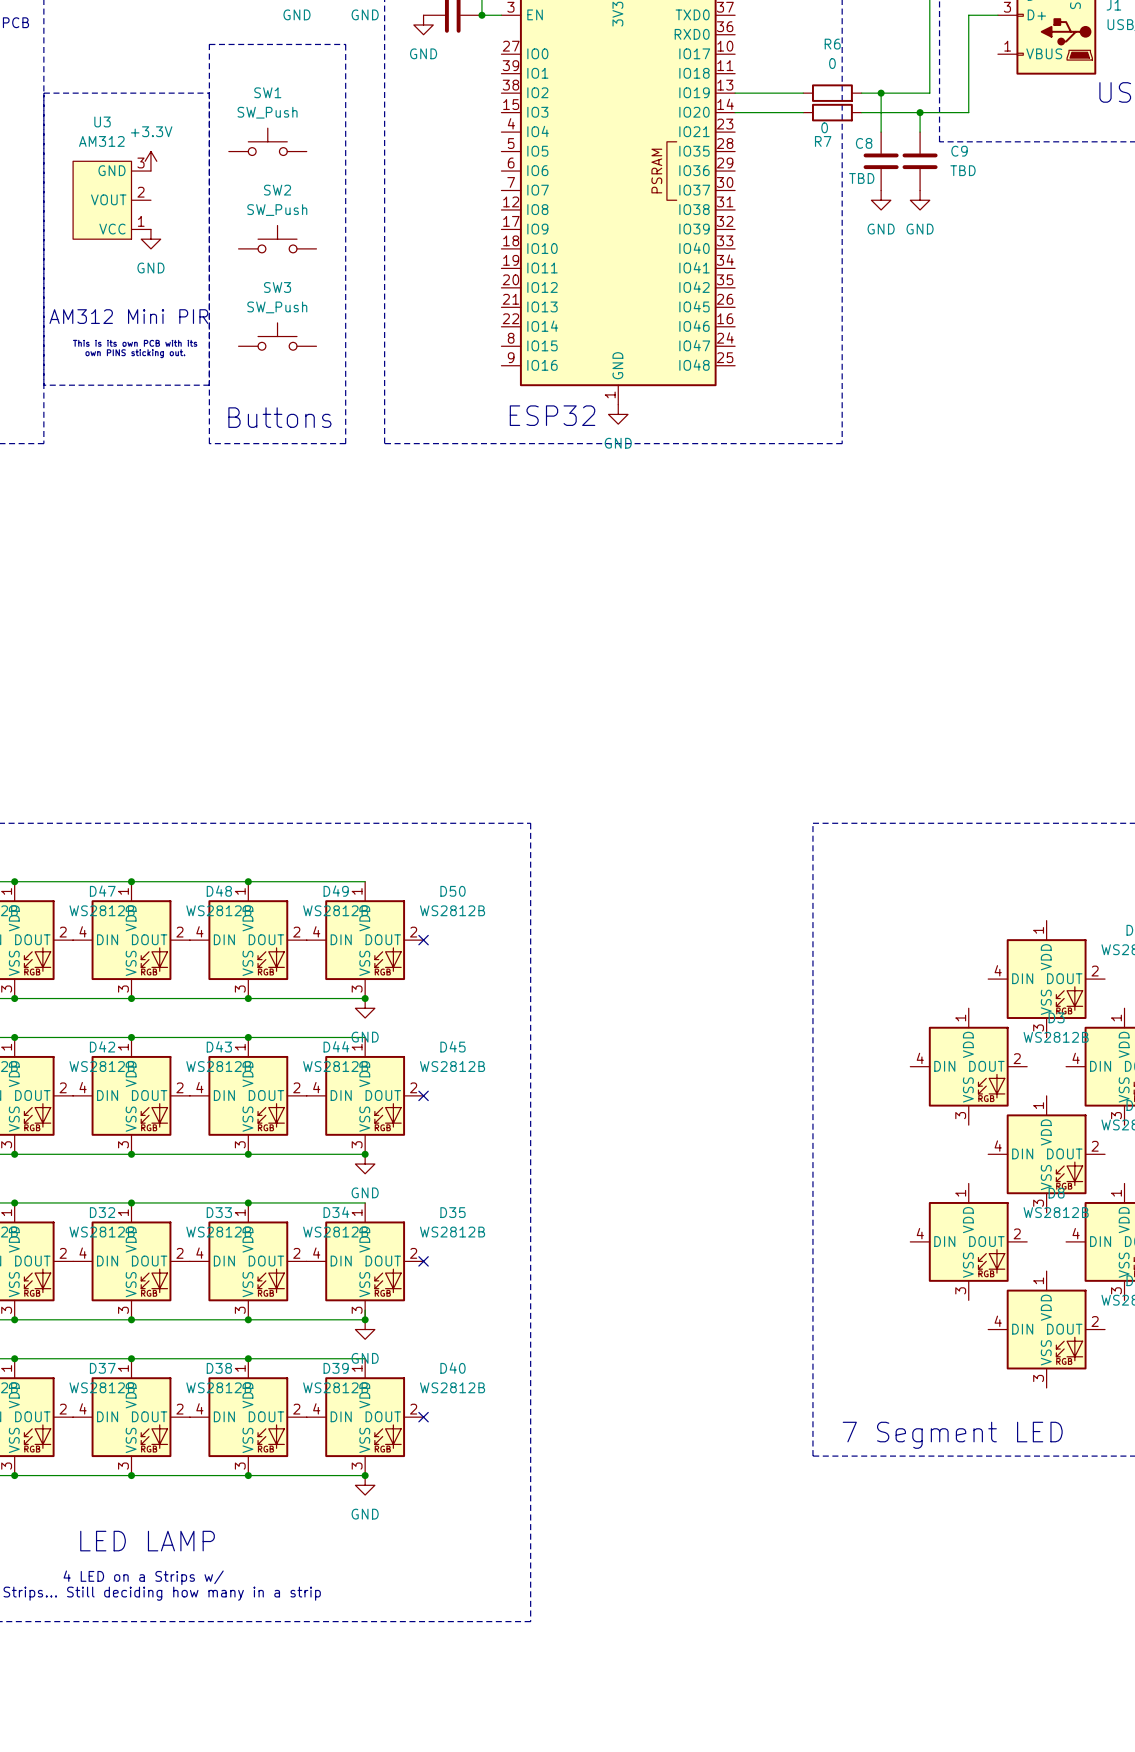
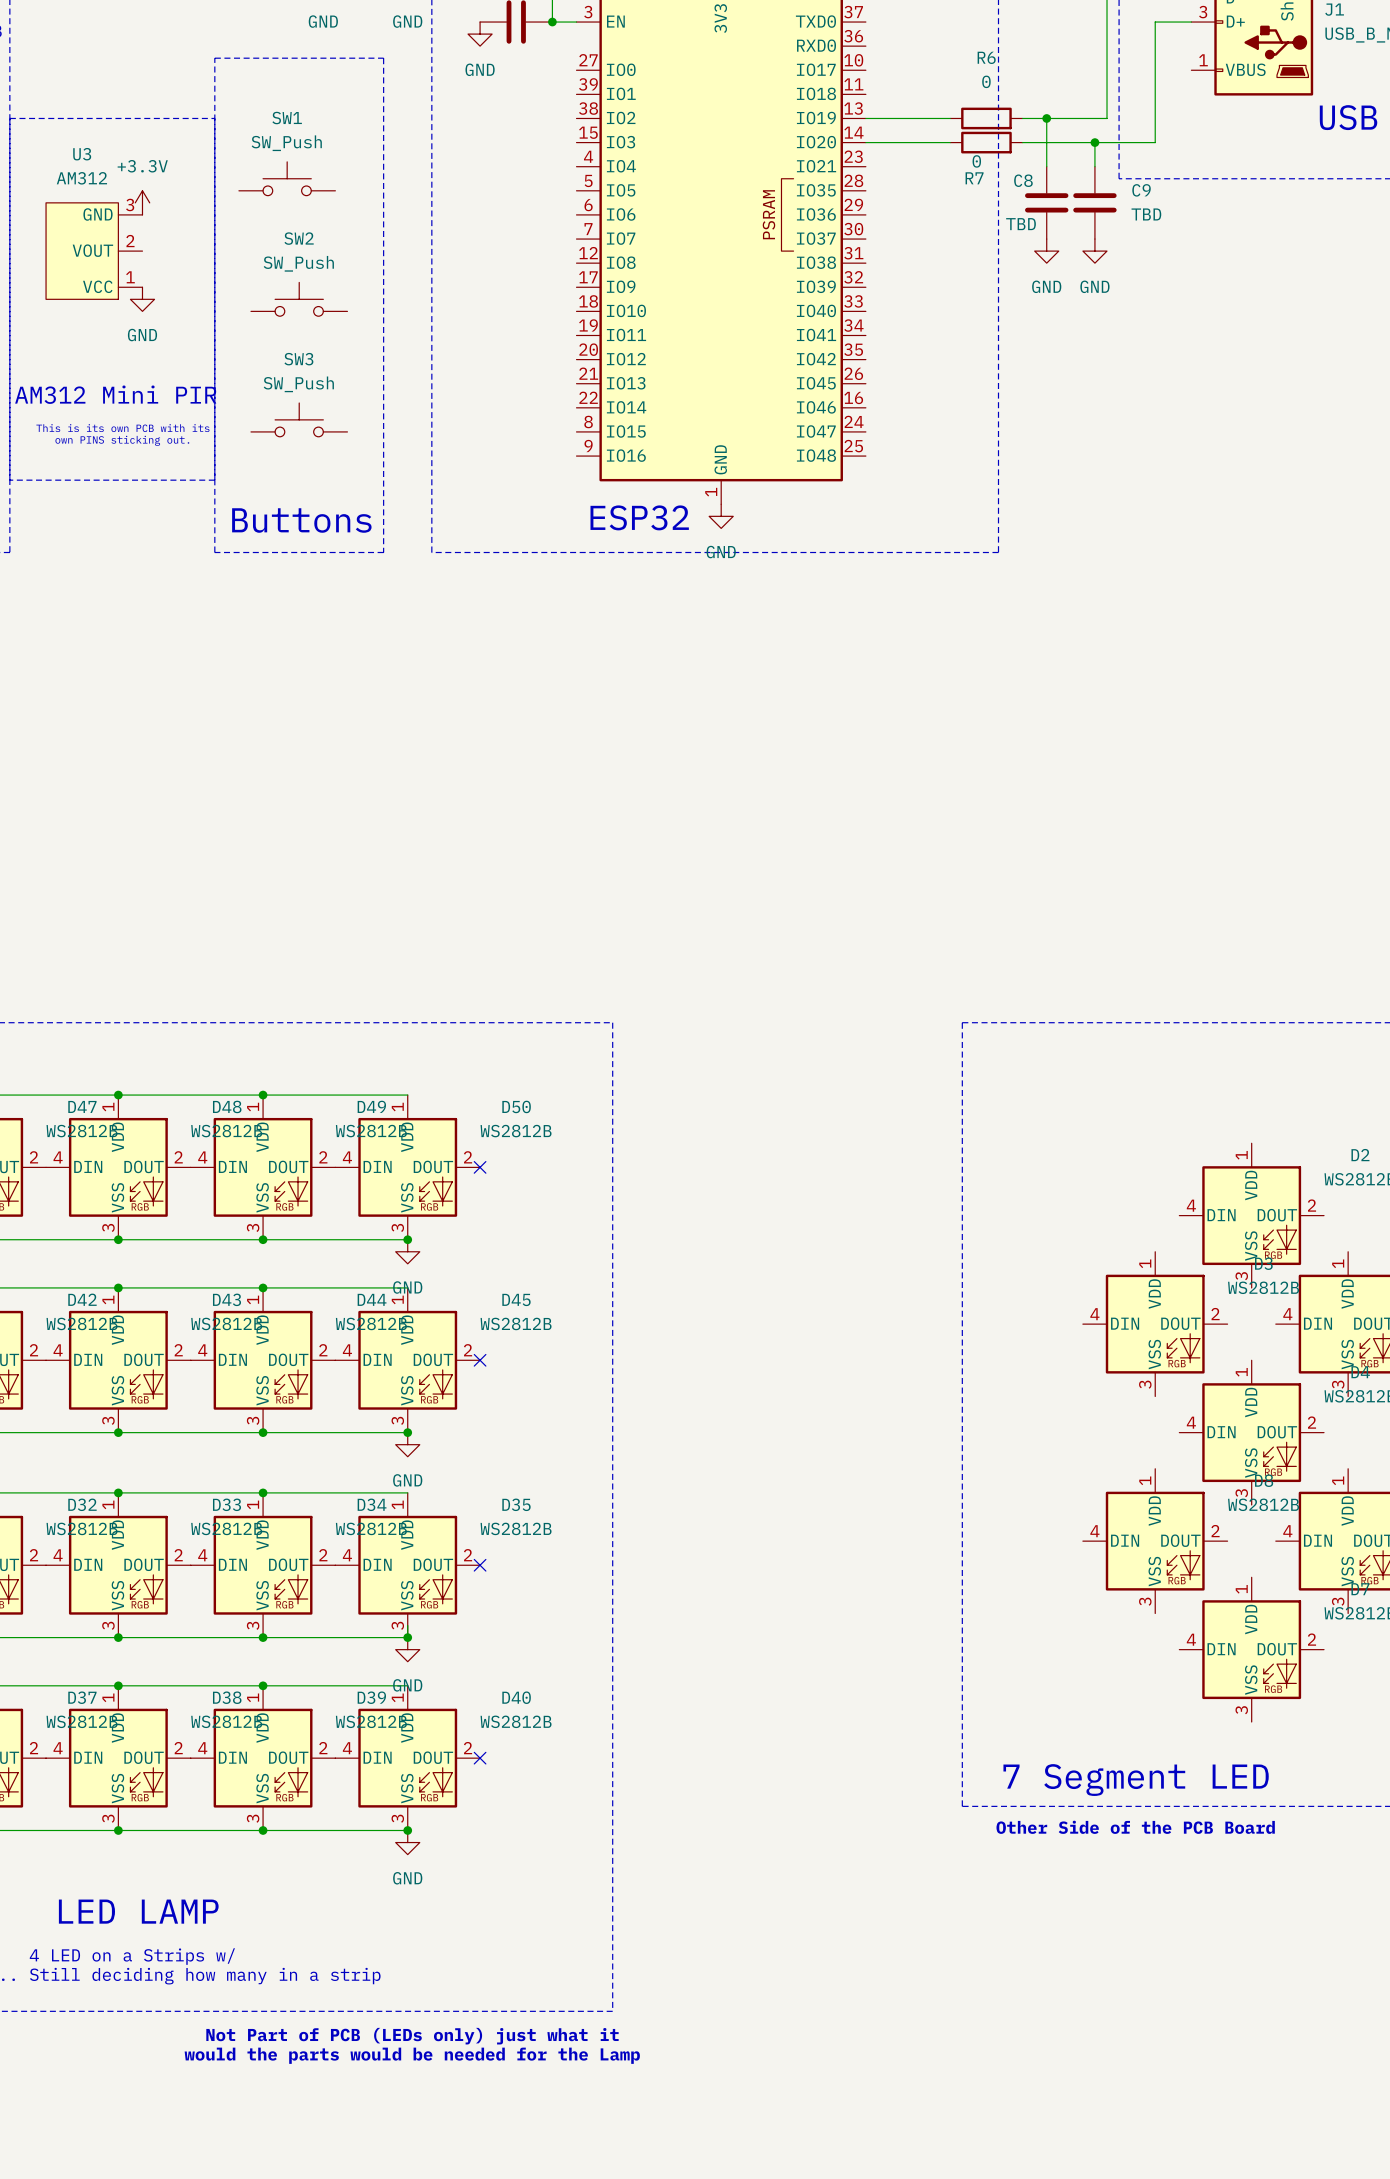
text: none -> Other Side of the PCB Board (1135, 1827)
text: none -> Not Part of PCB (LEDs only) just what it (412, 2036)
text: none -> would the parts would be needed for the Lamp (412, 2055)

